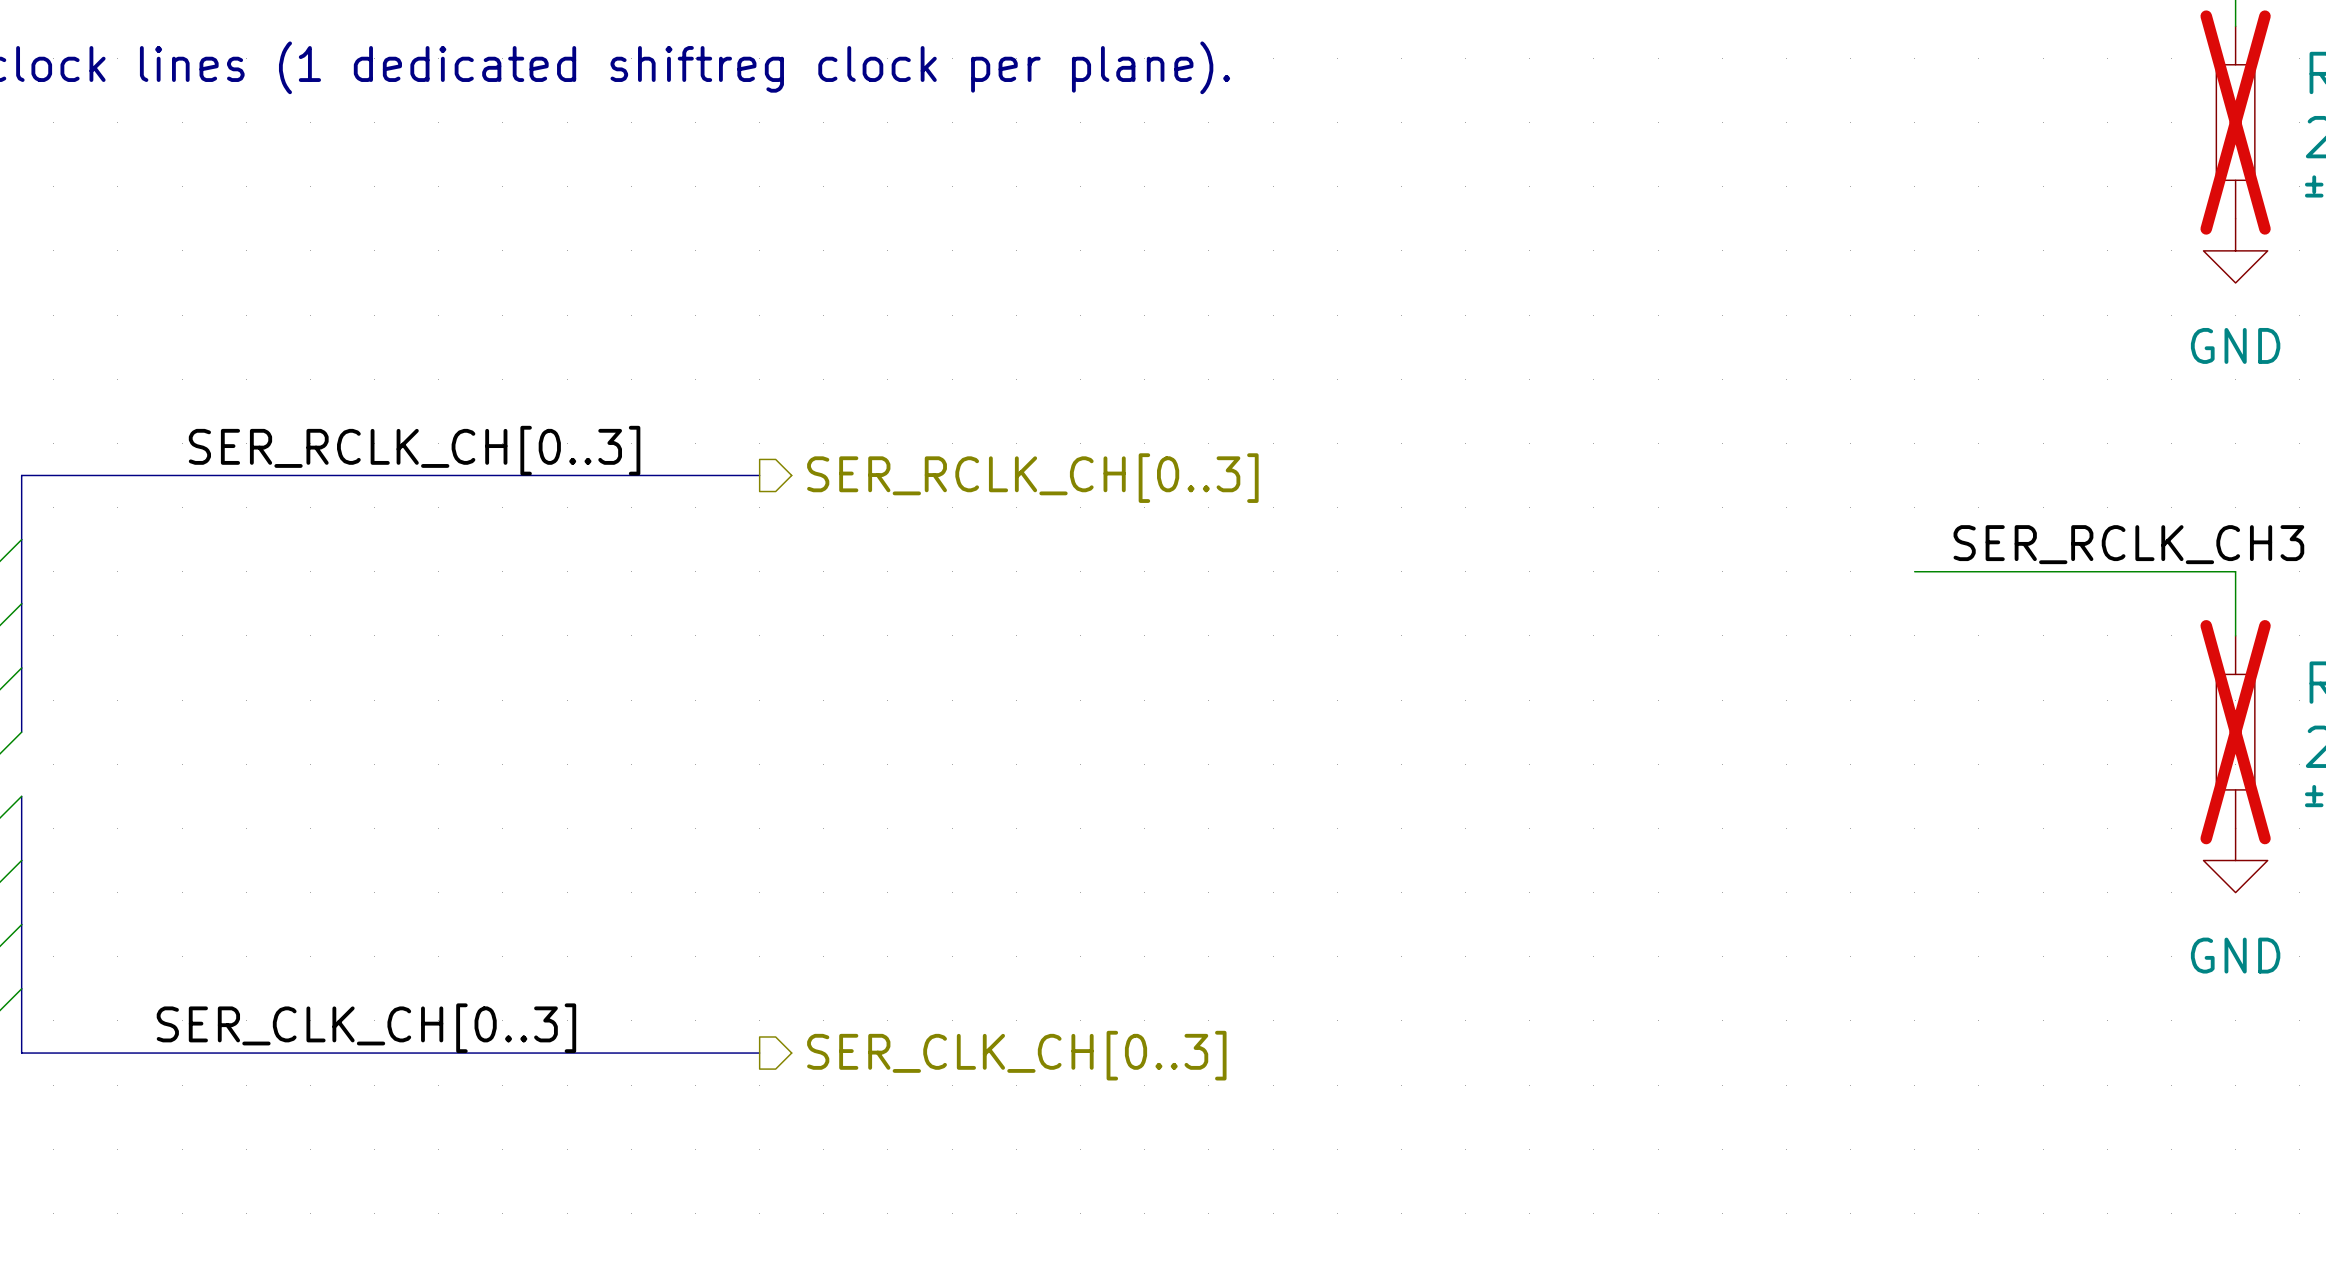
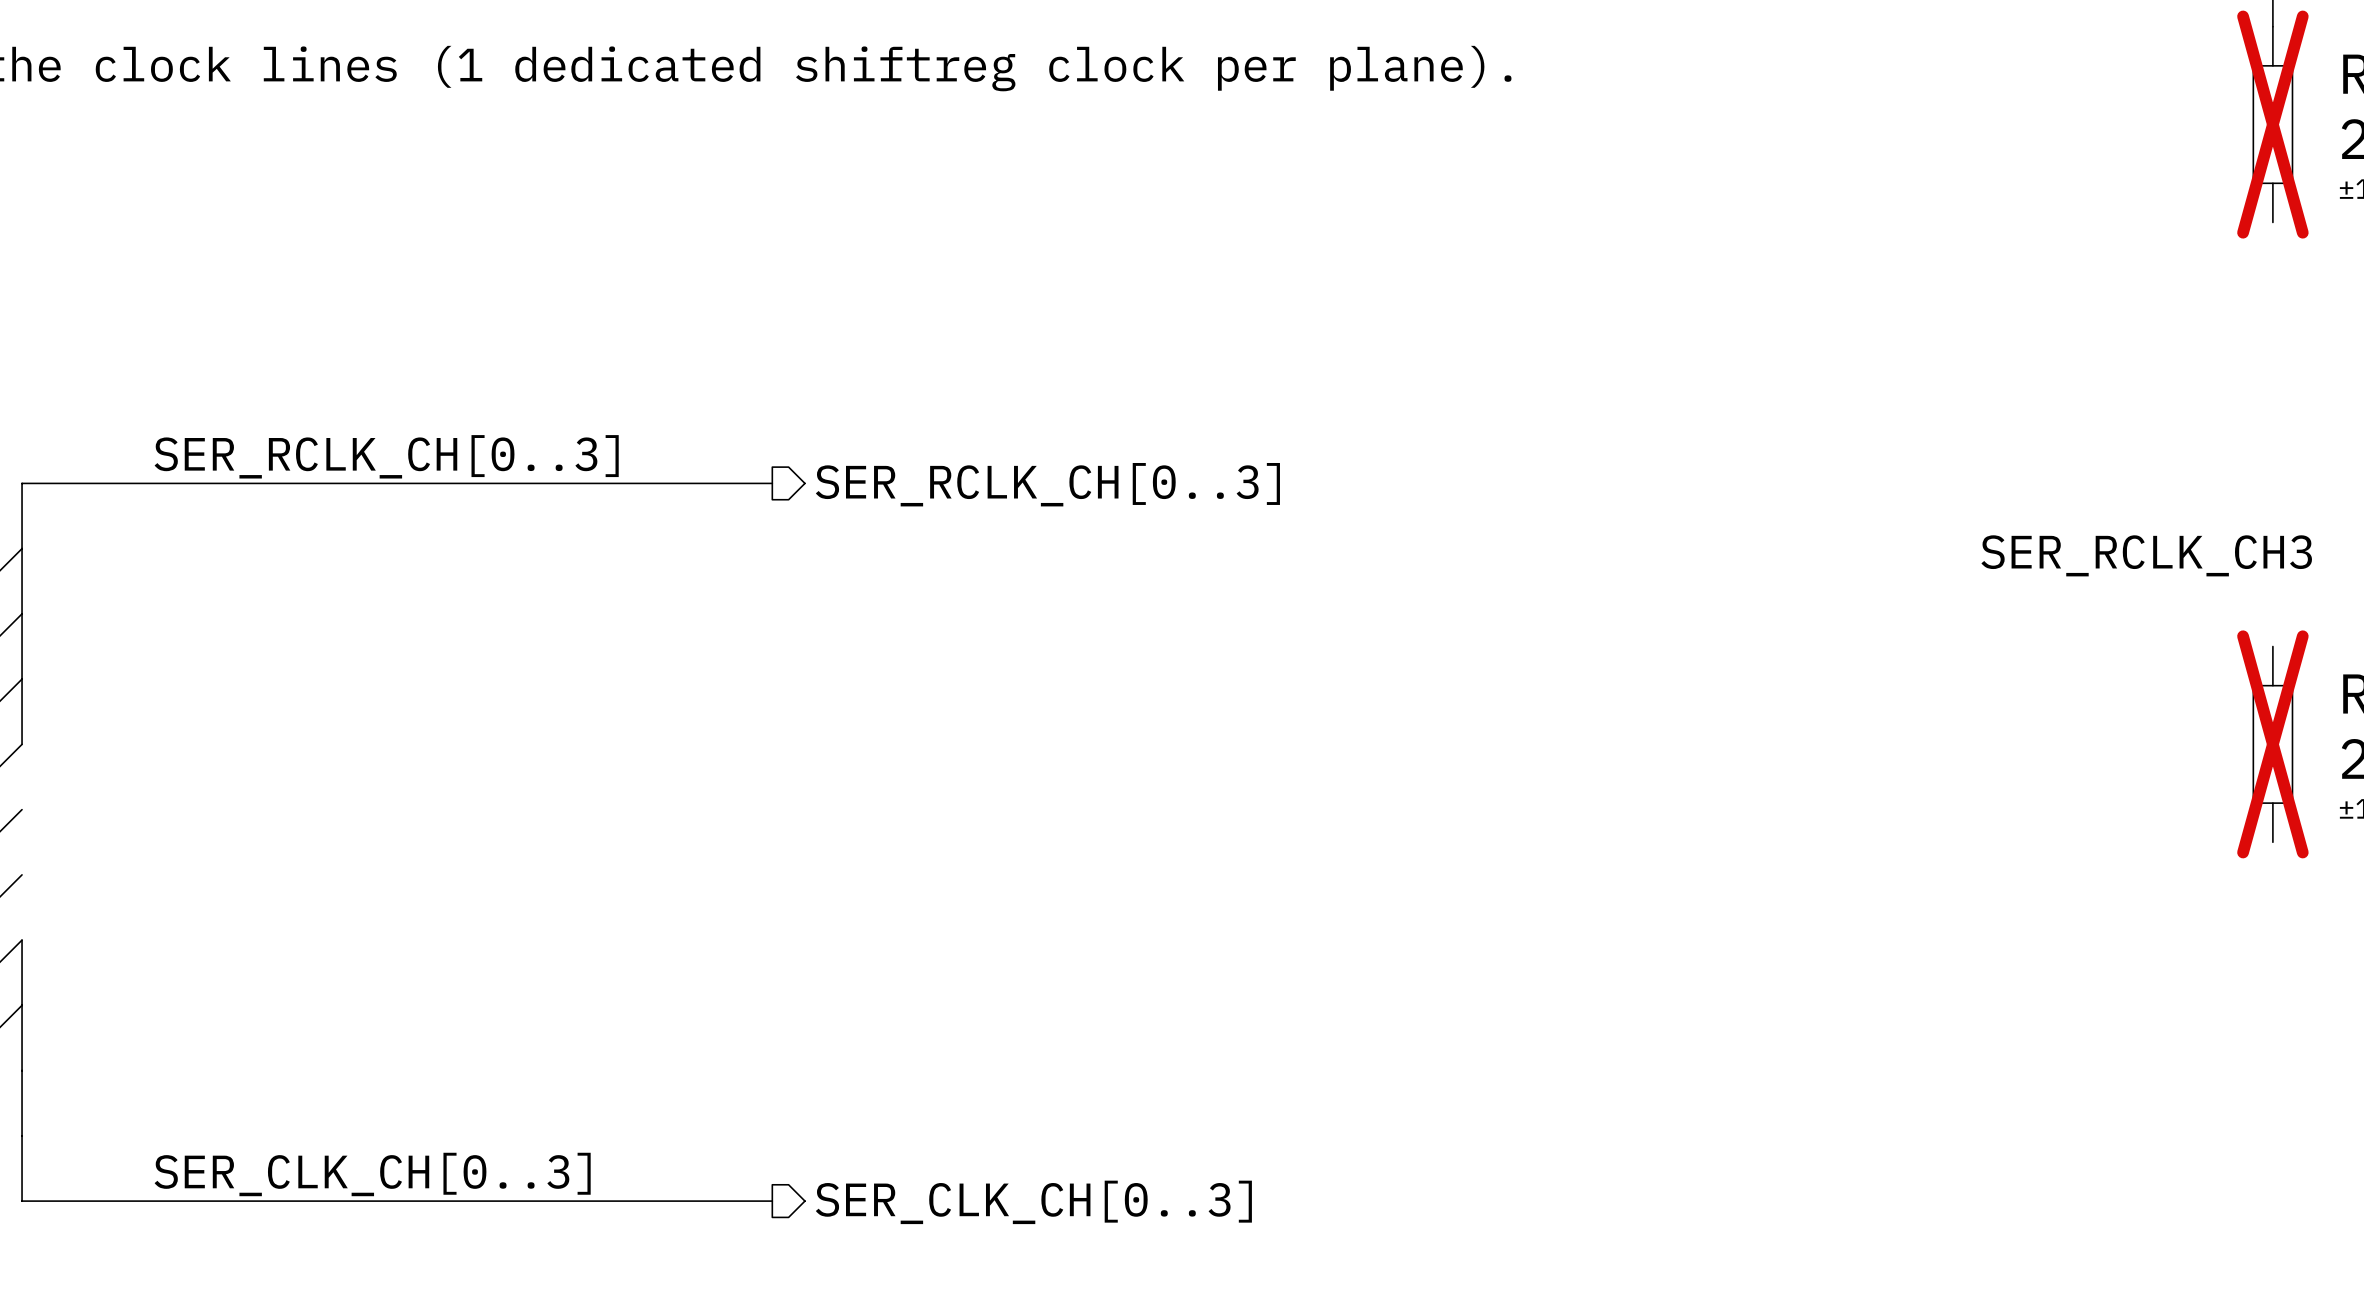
power symbol: GND (2235, 250) -> none
label position: SER_RCLK_CH[0..3] (414, 450) -> SER_RCLK_CH[0..3] (386, 456)
wire: (1914, 571) (2235, 571) (2235, 635) -> none
bus: (21, 796) (21, 924) -> none
power symbol: GND (2235, 860) -> none
label position: SER_CLK_CH[0..3] (366, 1028) -> SER_CLK_CH[0..3] (372, 1174)
bus: (21, 1053) (759, 1053) -> (22, 1070) (22, 1201) (772, 1201)
hierarchical label position: SER_CLK_CH[0..3] (1016, 1055) -> SER_CLK_CH[0..3] (1033, 1202)

